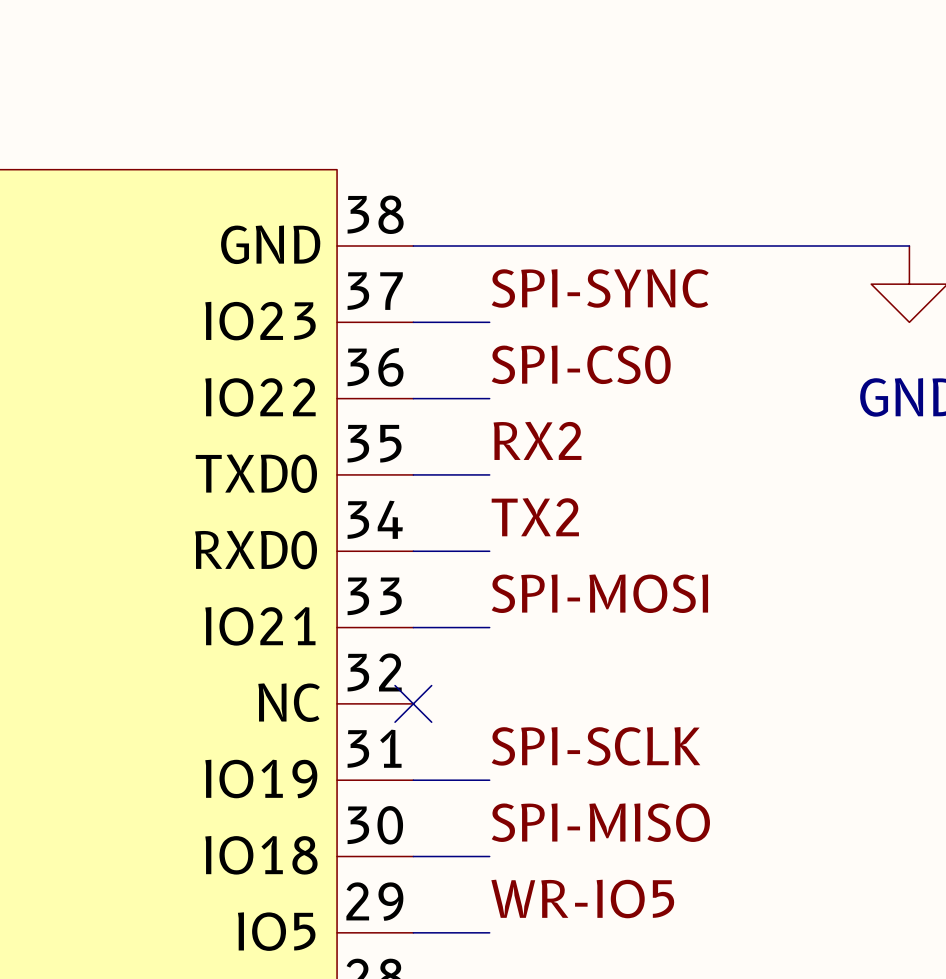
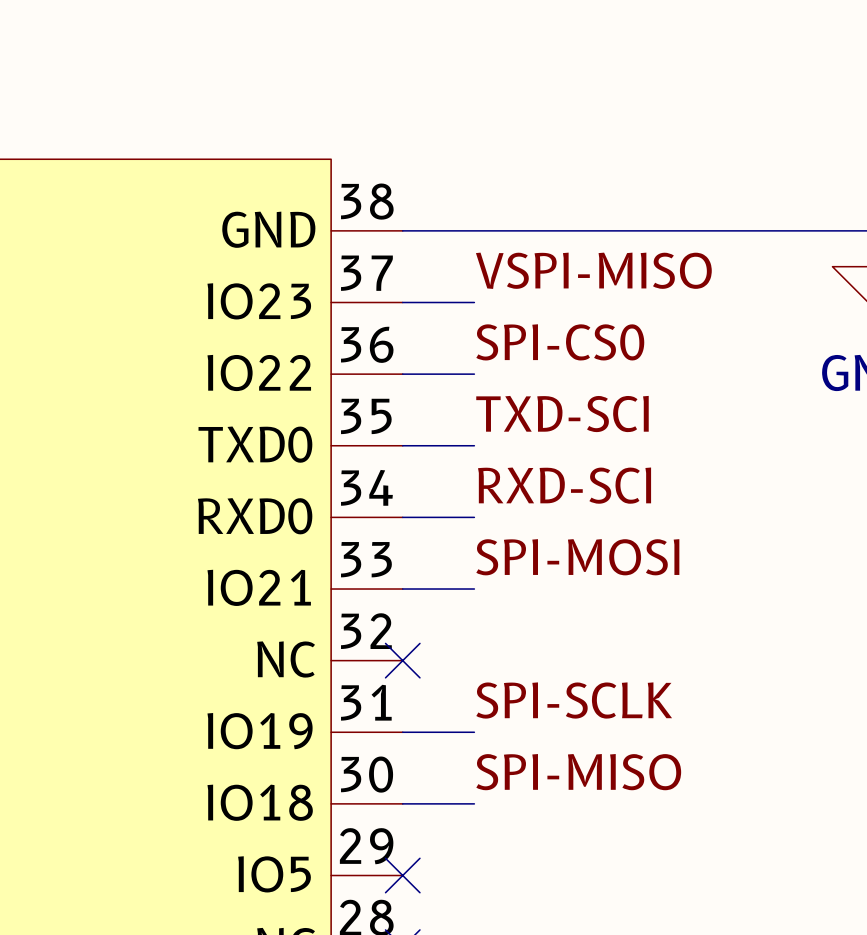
label: SPI-SYNC (600, 288) -> VSPI-MISO (593, 270)
label: RX2 (537, 440) -> TXD-SCI (562, 413)
label: TX2 (535, 517) -> RXD-SCI (564, 485)
label: WR-IO5 (582, 898) -> none
wire: (413, 932) (489, 932) -> none
no-connect mark: none -> (402, 875)

